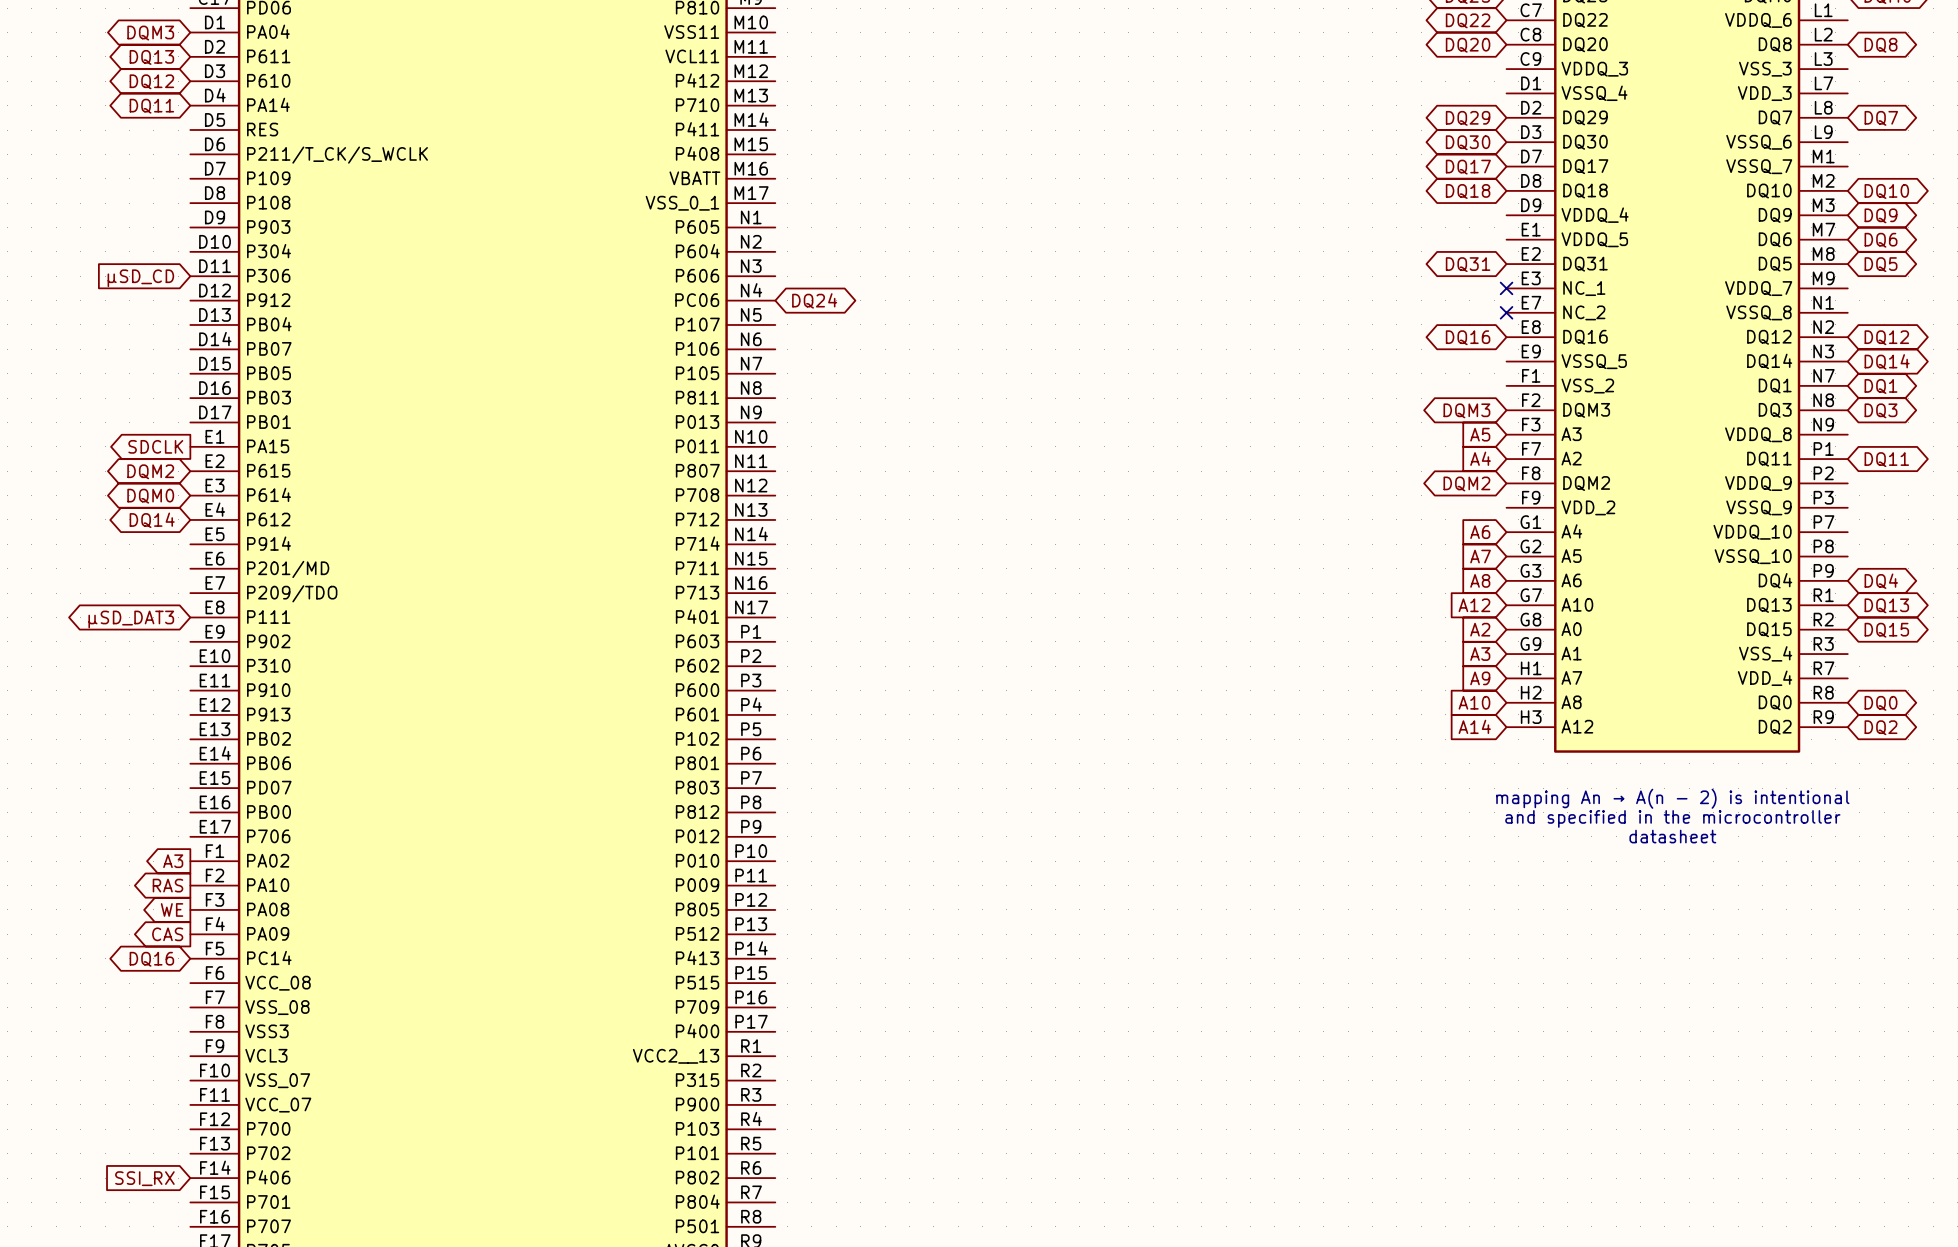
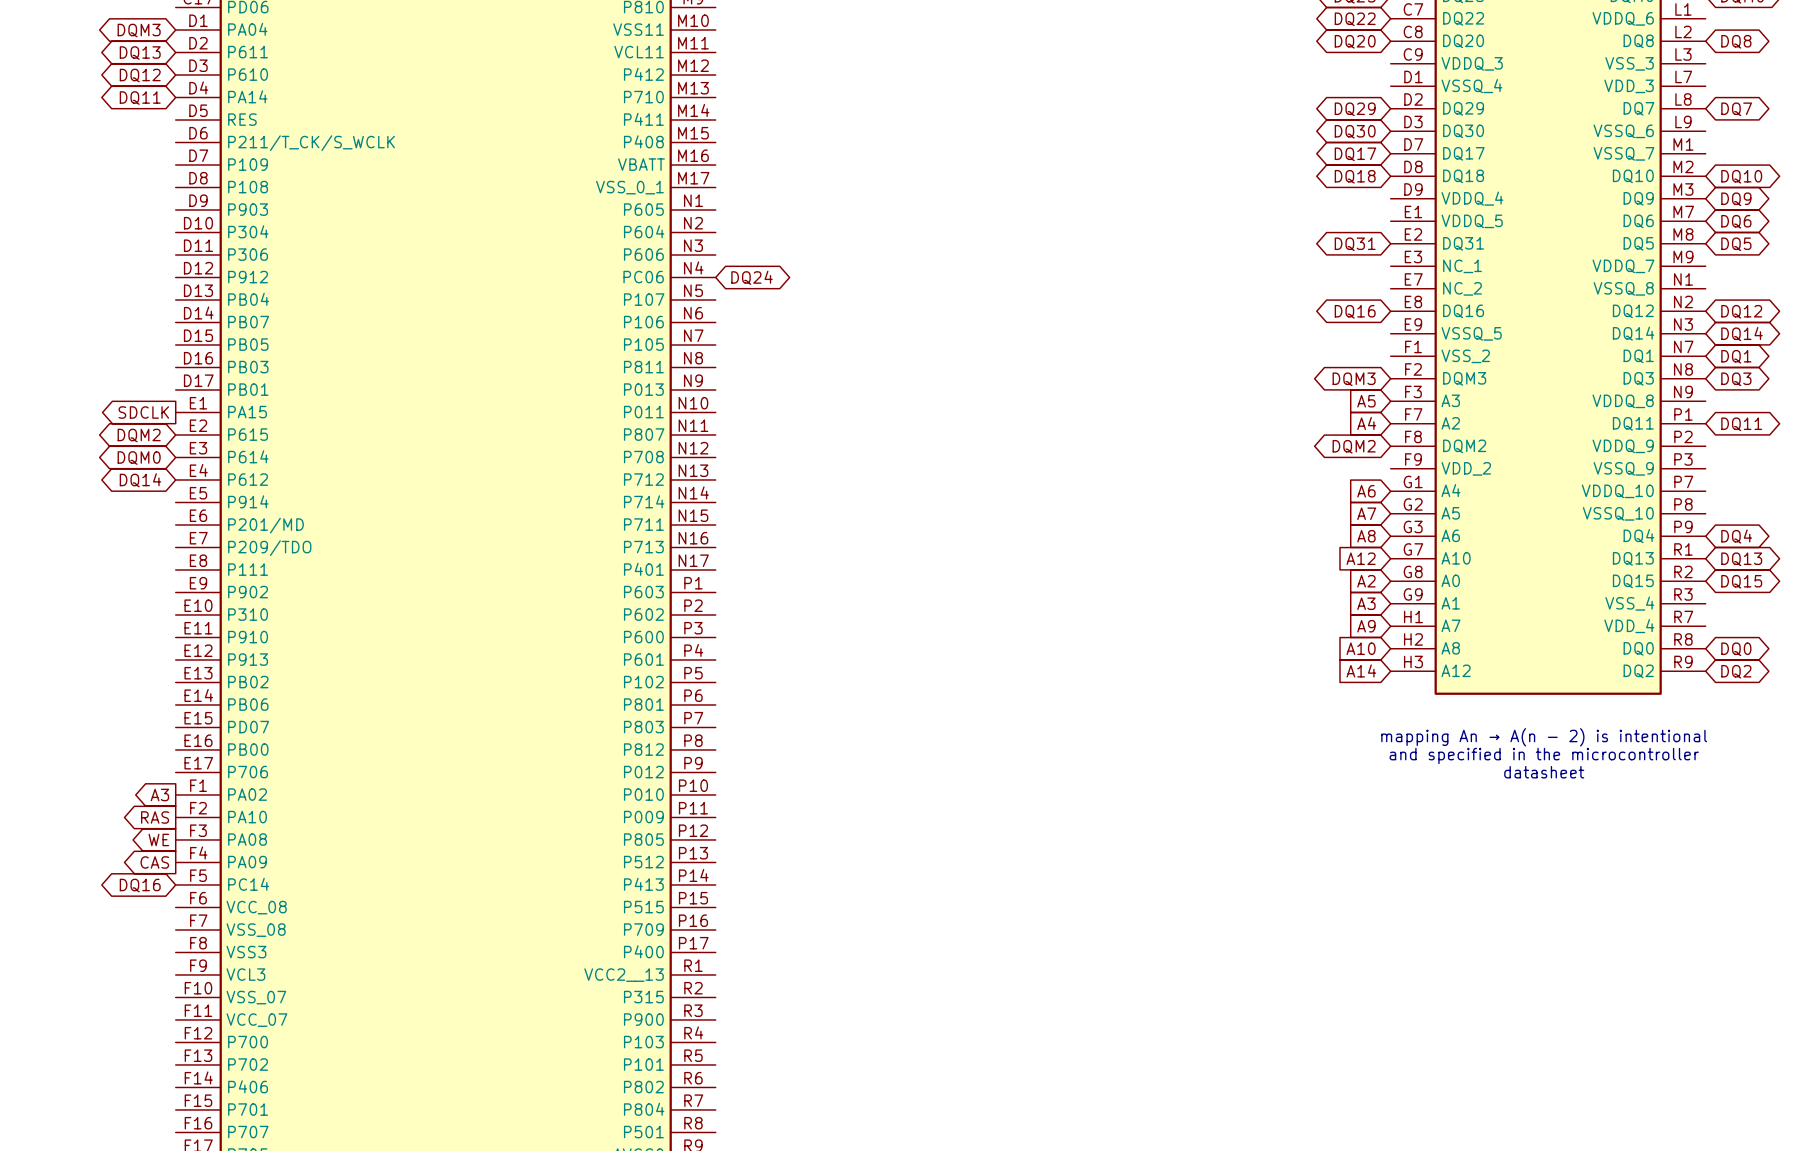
global label: μSD_CD (140, 278) -> none
no-connect mark: (1506, 288) -> none
no-connect mark: (1506, 312) -> none
global label: μSD_DAT3 (131, 619) -> none
global label: SSI_RX (144, 1178) -> none

